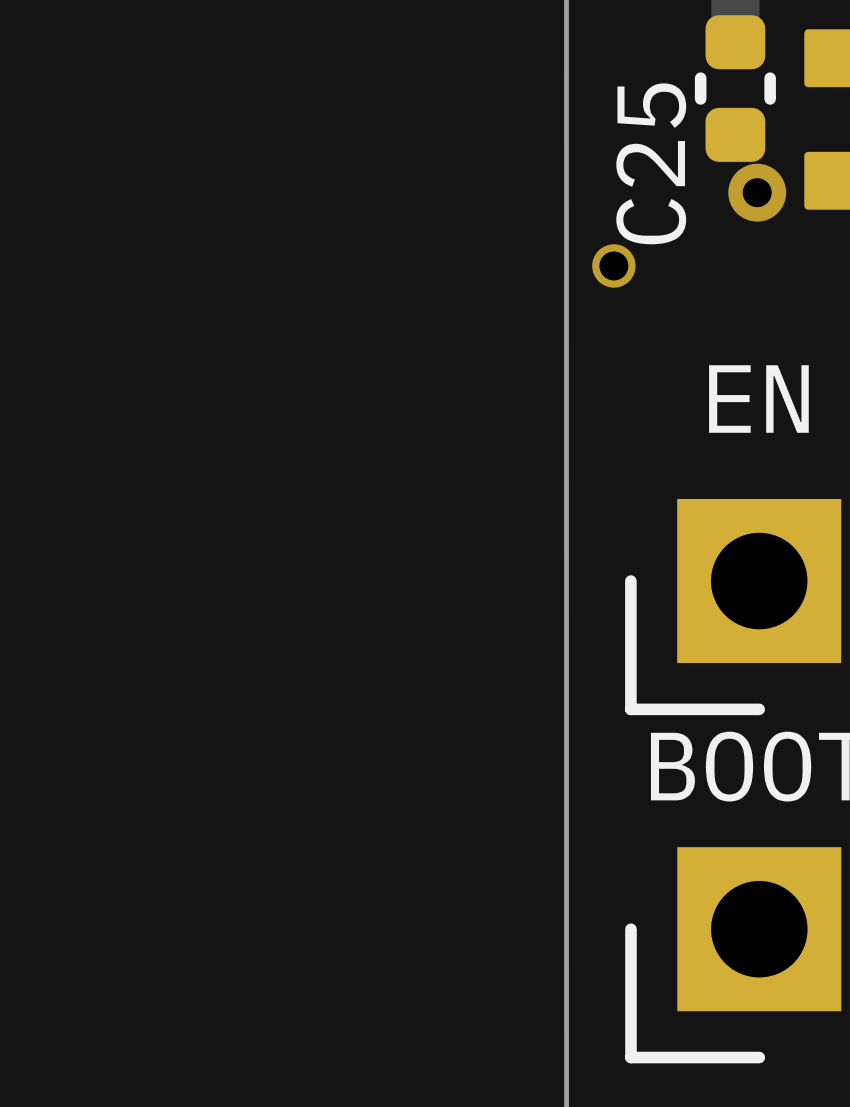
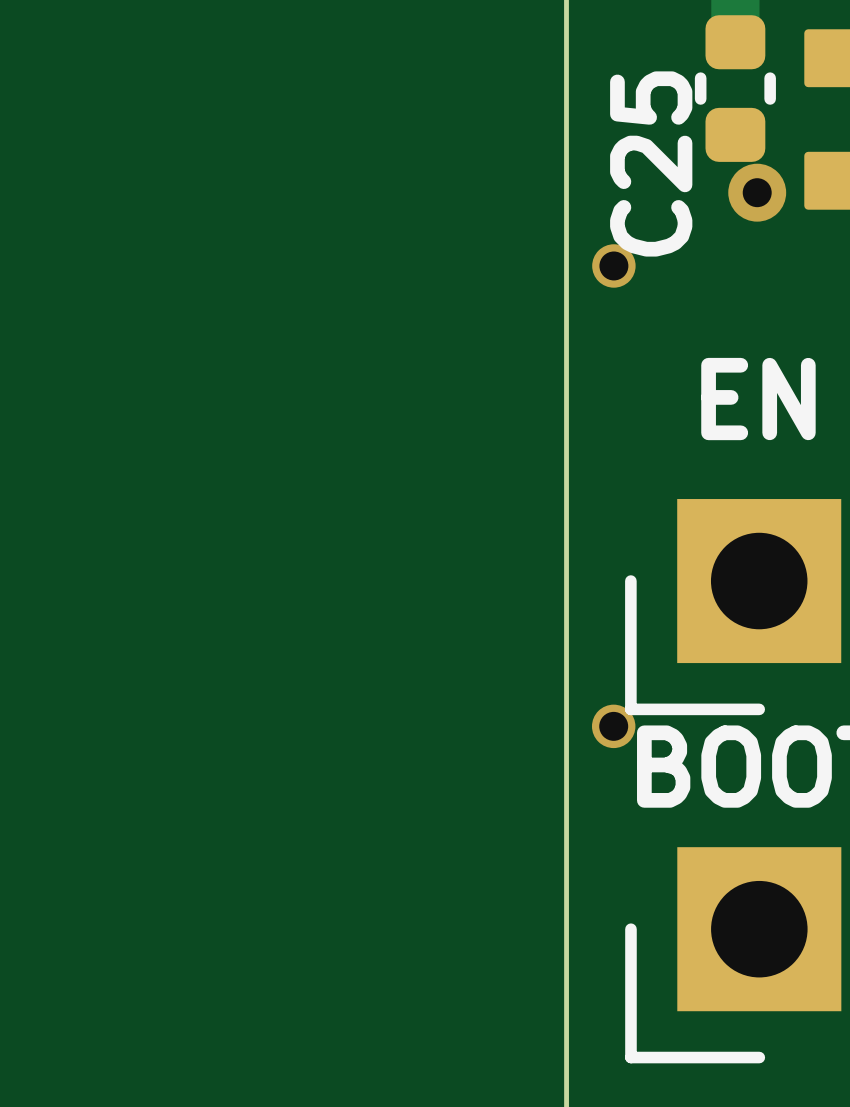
via: none -> (613, 726)

